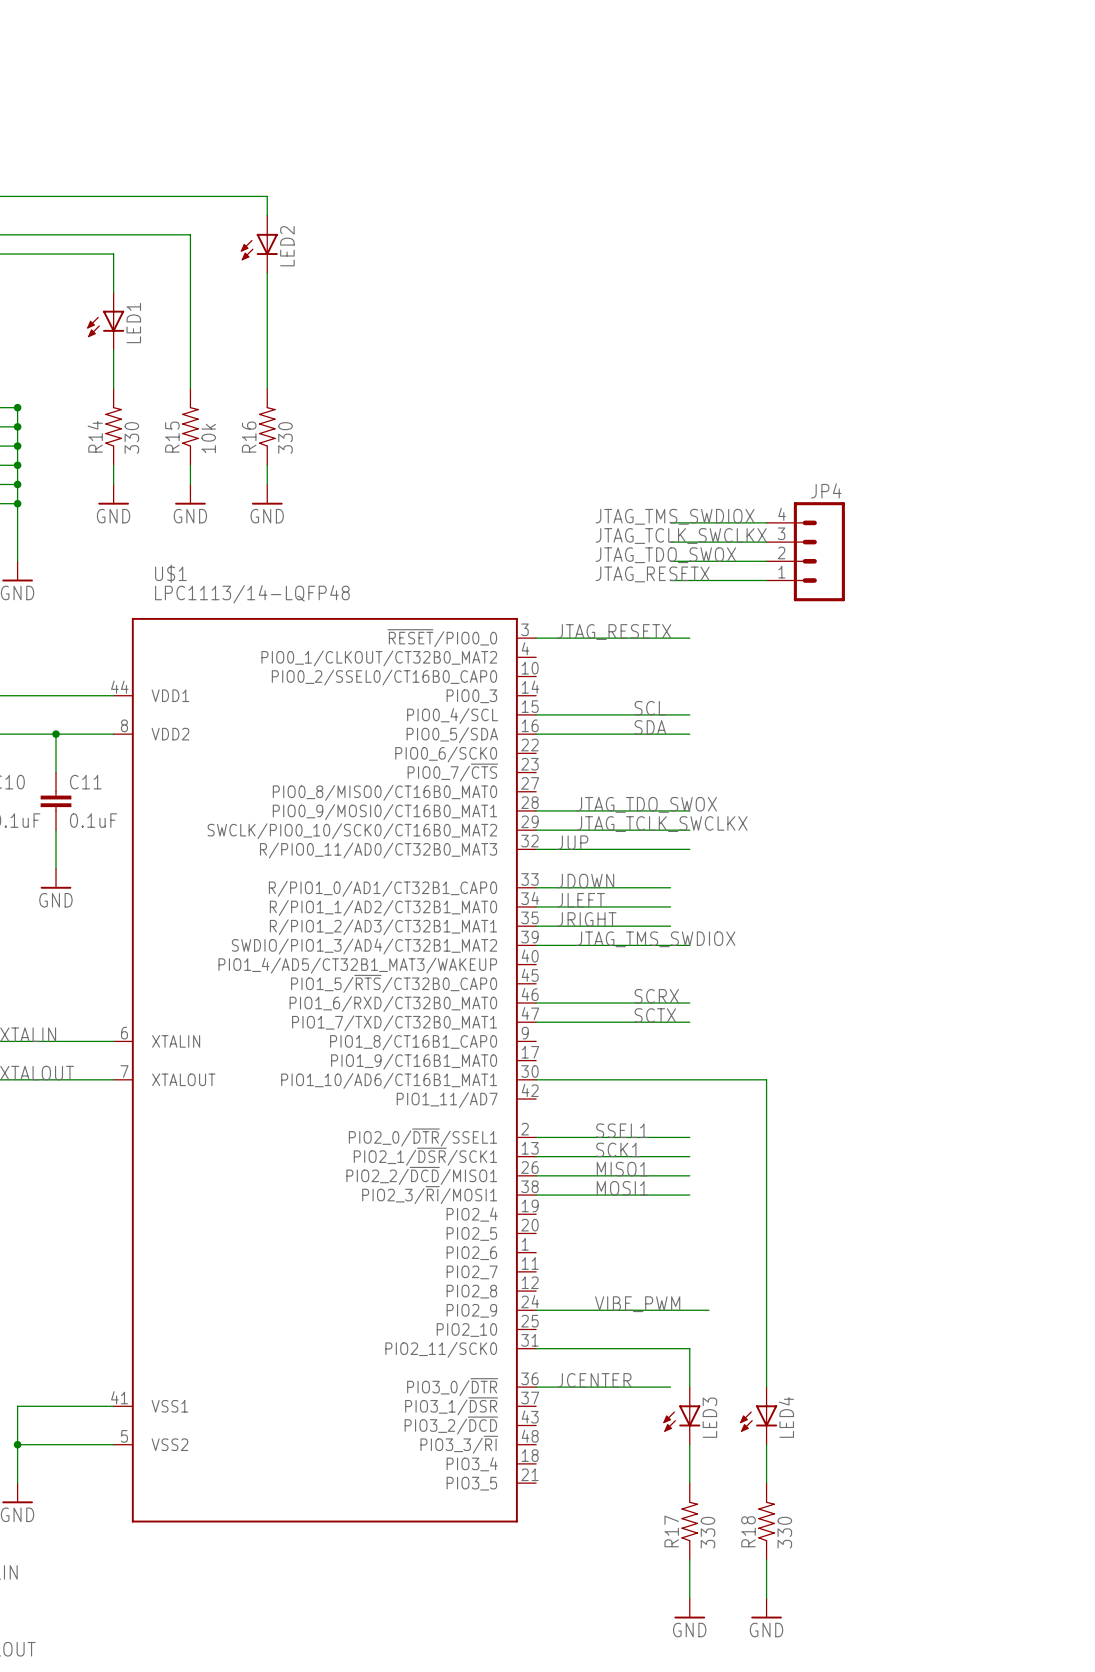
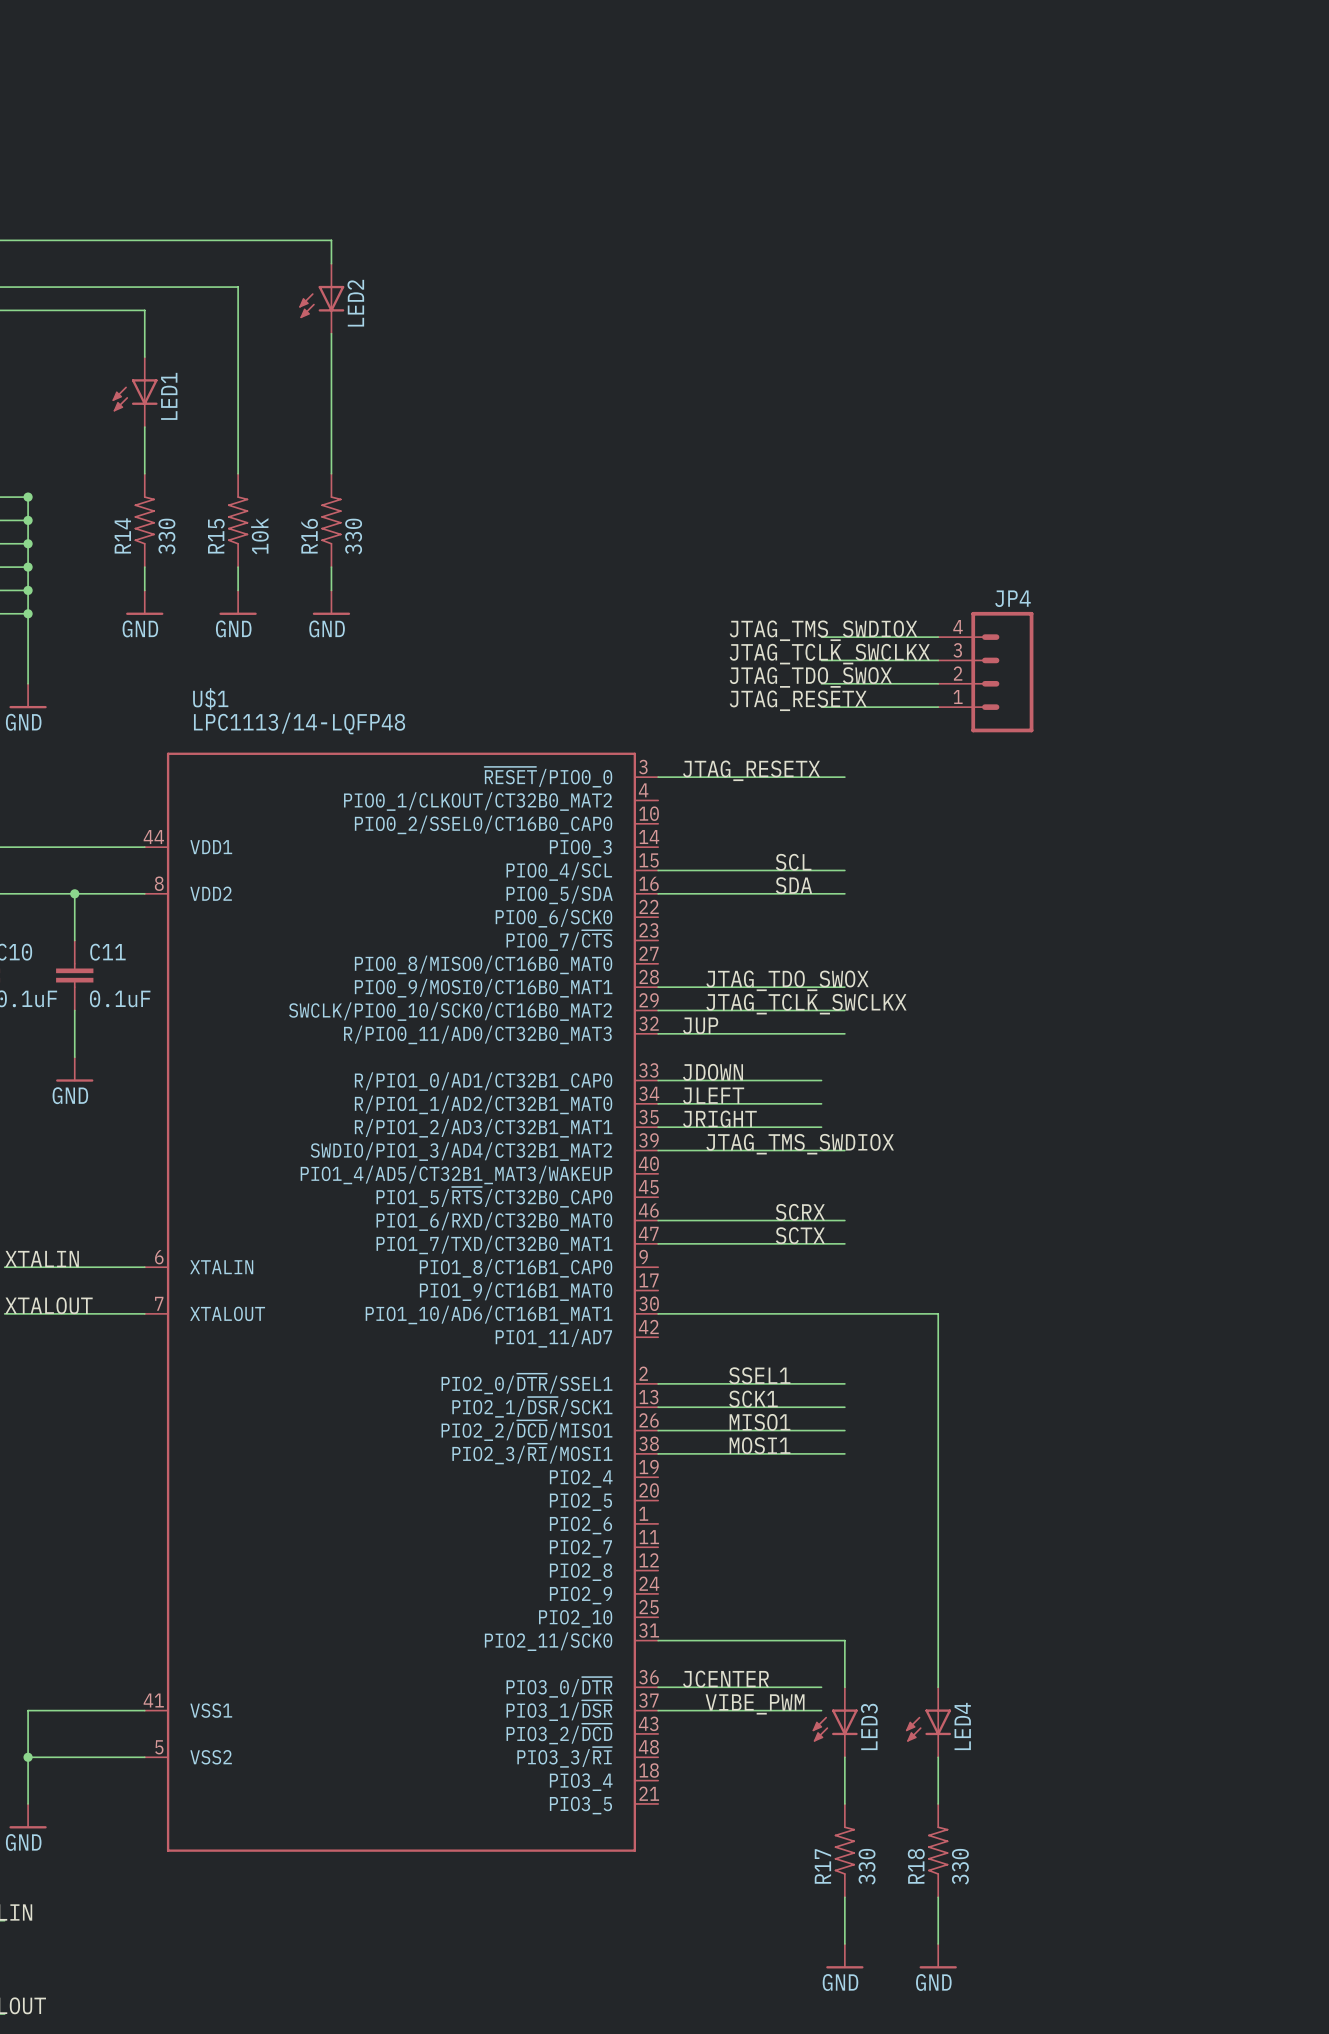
label position: VIBE_PWM (637, 1304) -> VIBE_PWM (755, 1704)
wire: (536, 1310) (708, 1310) -> none
wire: none -> (658, 1710) (821, 1710)

